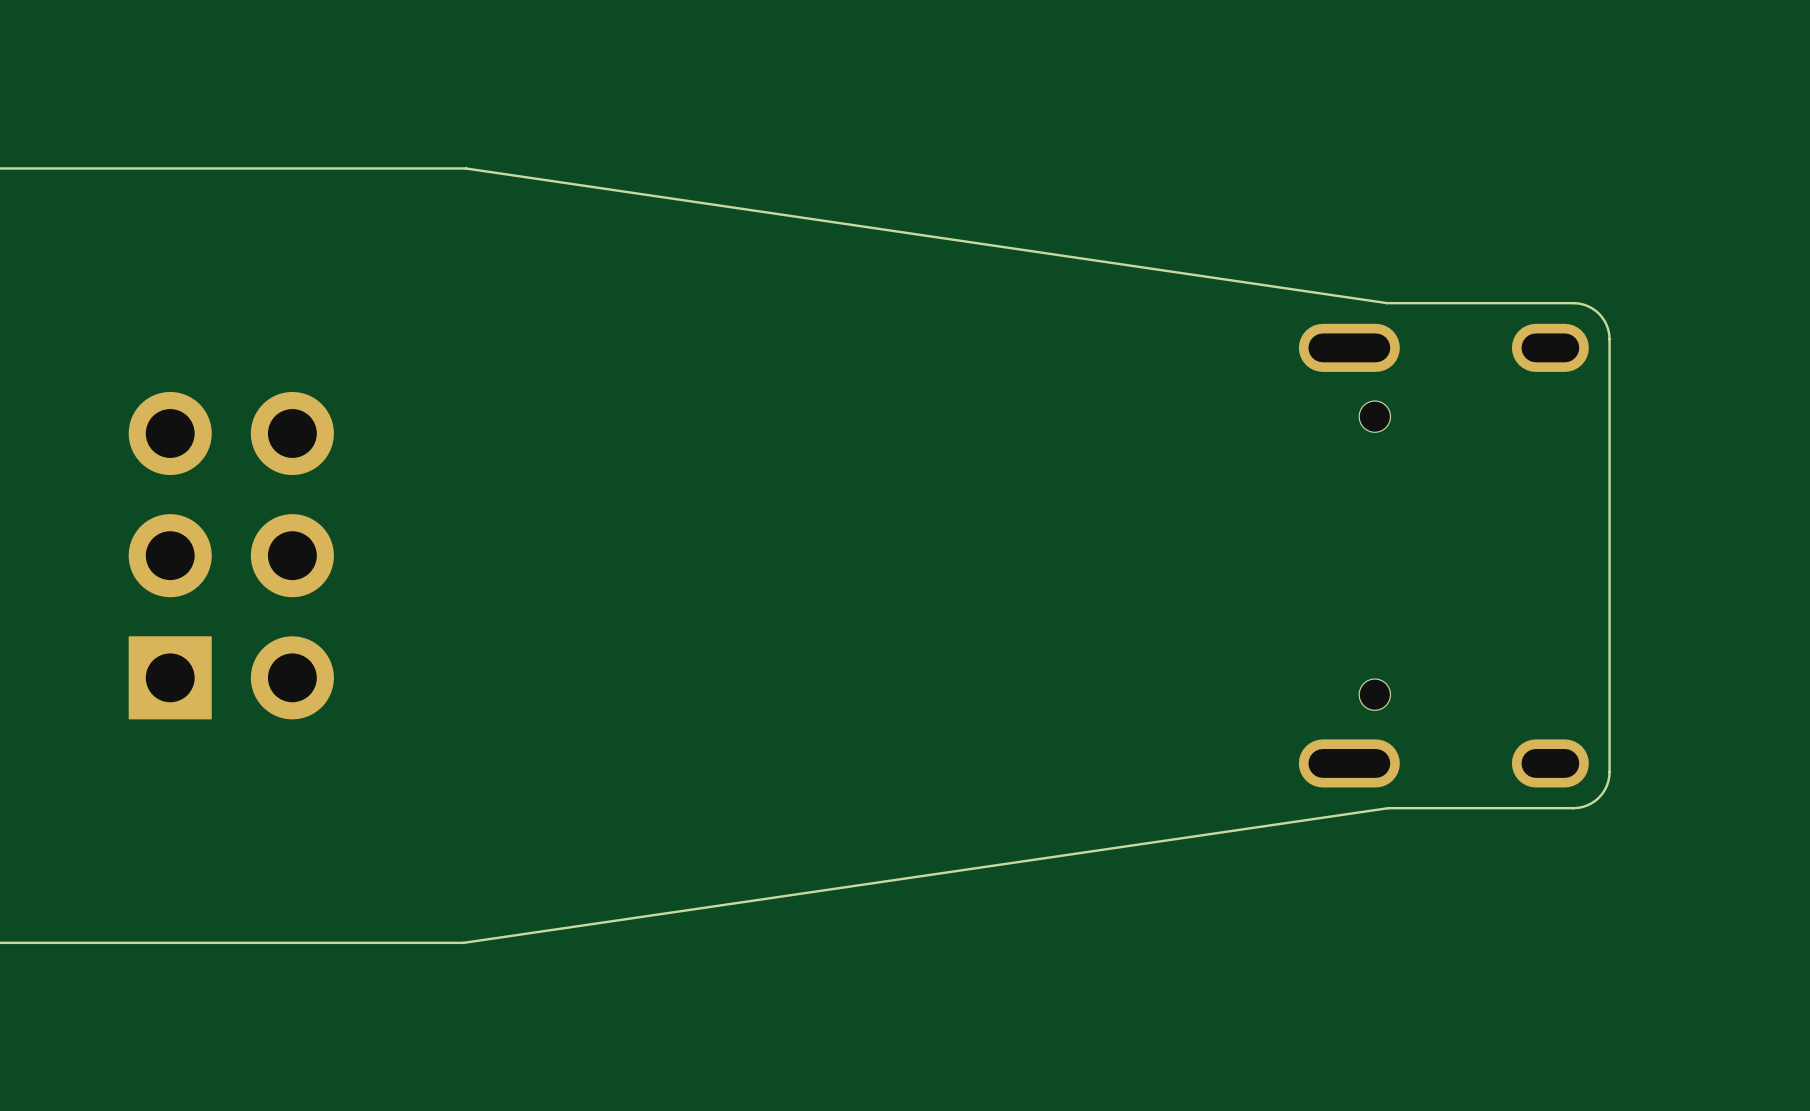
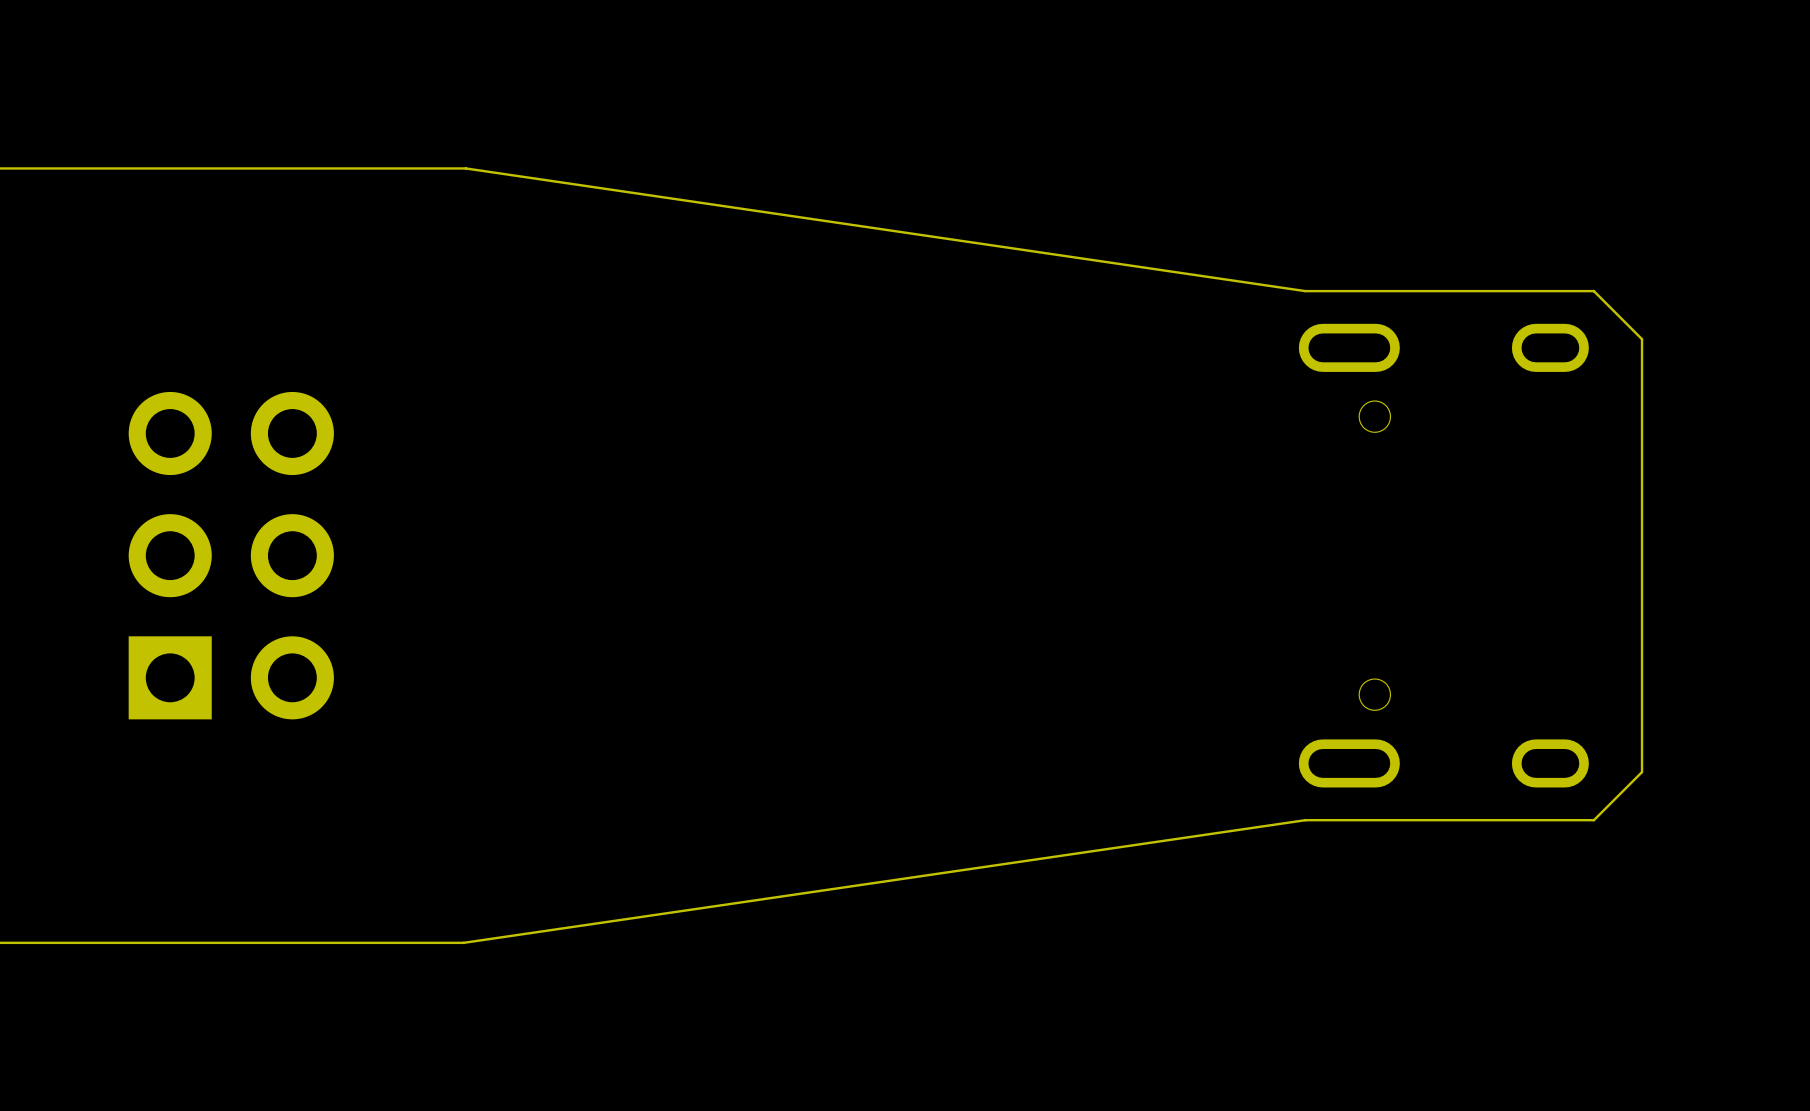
board edge: (466, 168) (1387, 303) (1573, 303) (1591, 307) (1604, 321) (1609, 339) (1609, 772) (1606, 785) (1598, 797) (1587, 805) (1578, 807) (1388, 808) (463, 942) -> (466, 168) (1305, 291) (1593, 291) (1642, 339) (1642, 772) (1593, 820) (1305, 820) (463, 942)

